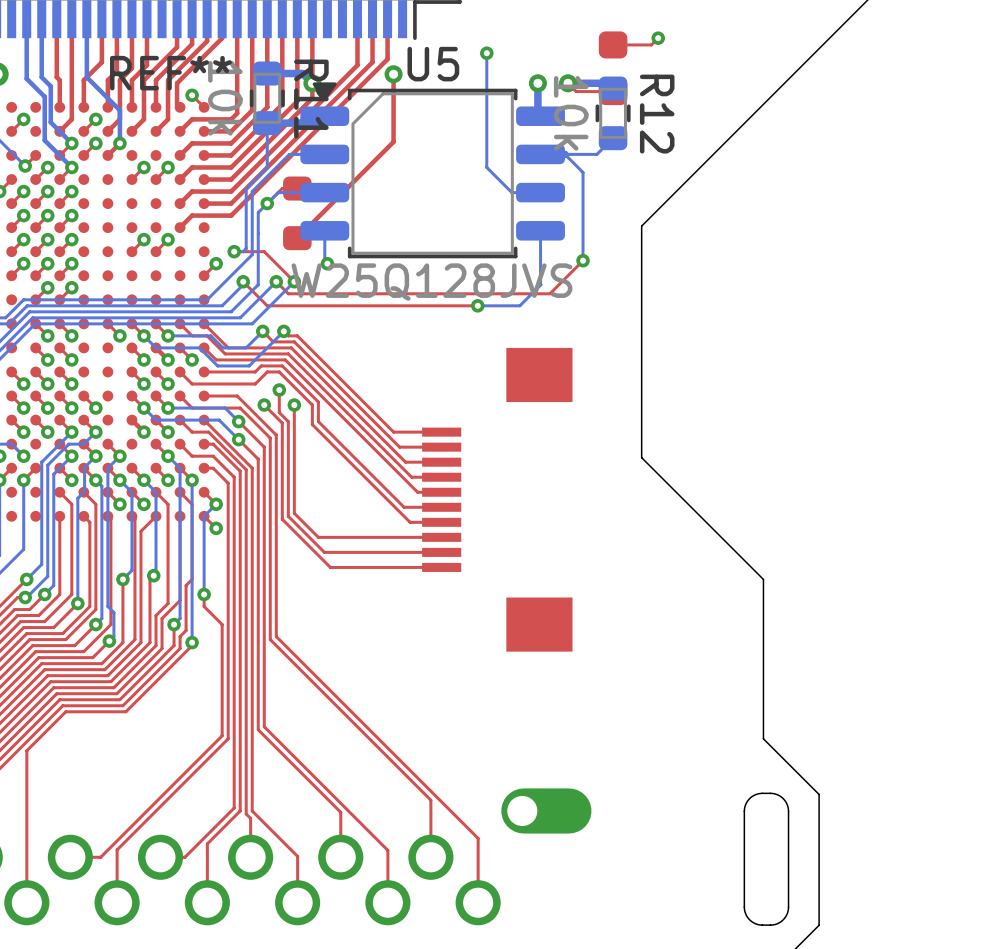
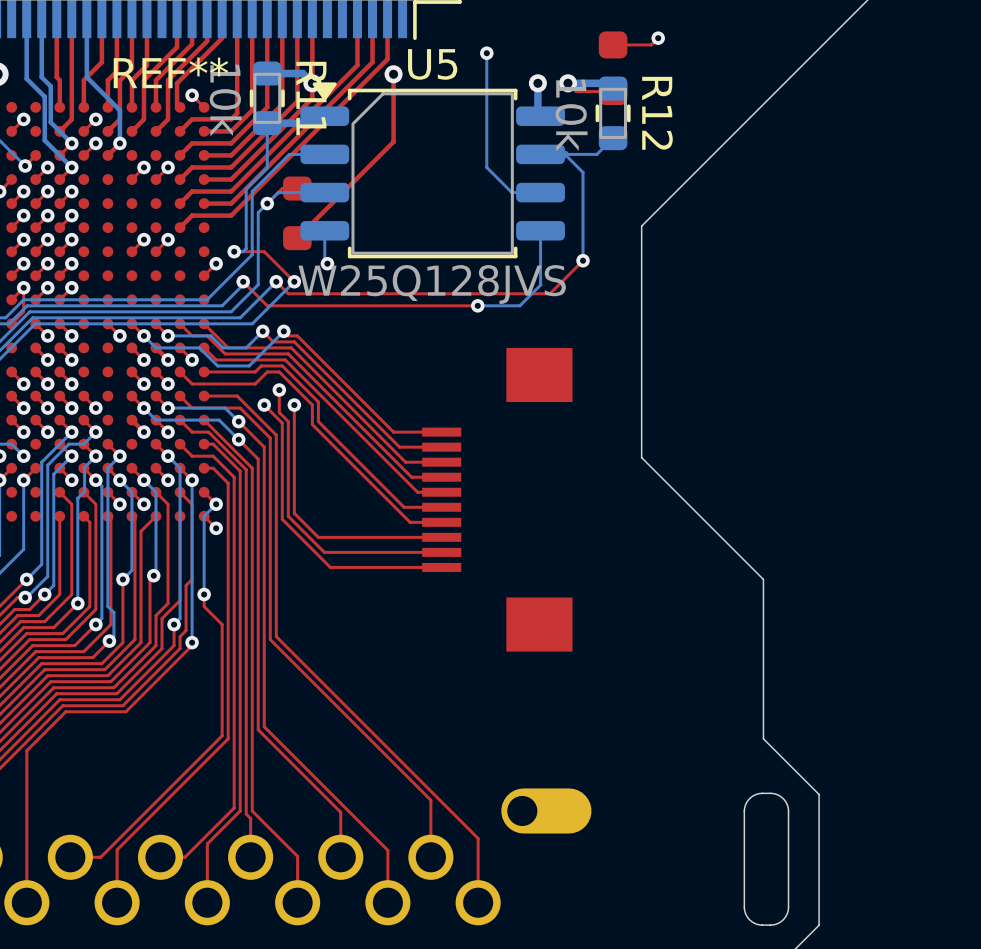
via: none -> (23, 287)
top track: none -> (11, 299) (23, 287) (23, 311) (11, 323)

